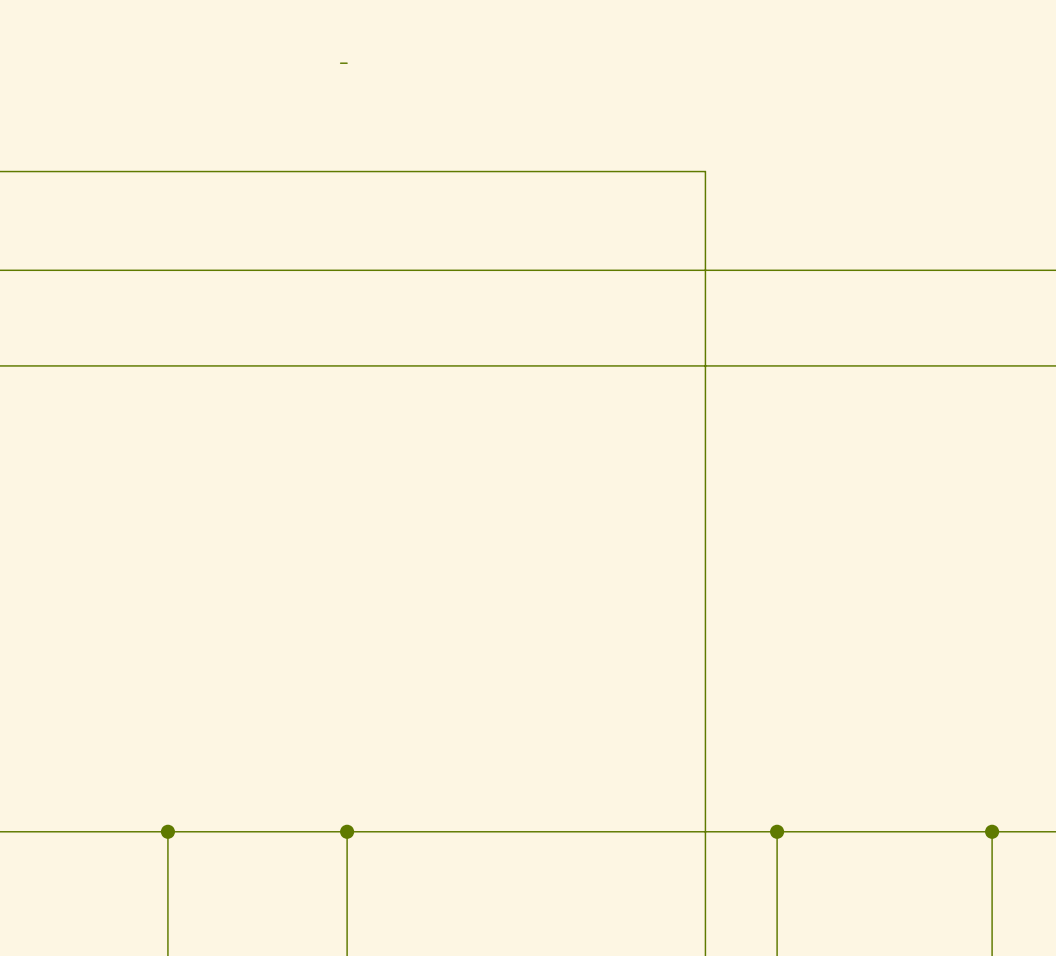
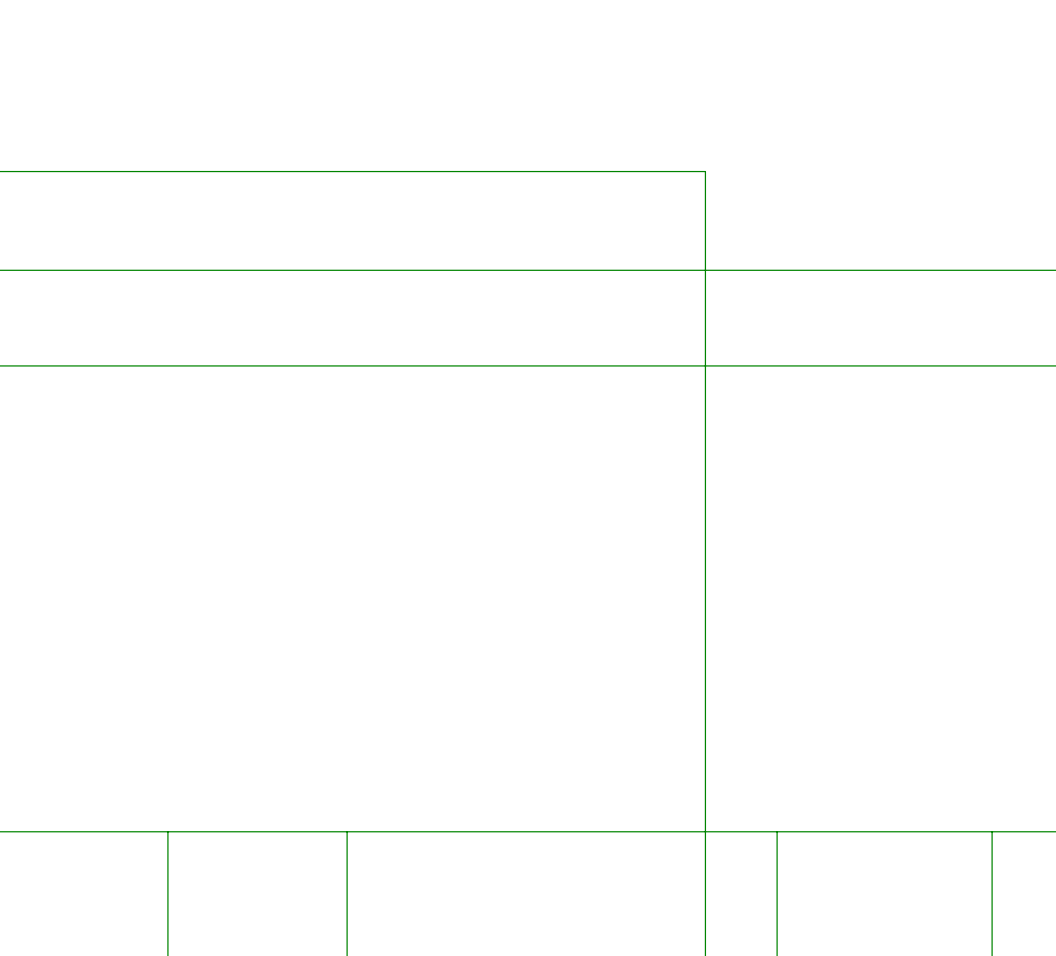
wire: (340, 63) (347, 63) -> none
junction: (167, 831) -> none
junction: (347, 831) -> none
junction: (777, 831) -> none
junction: (992, 831) -> none

